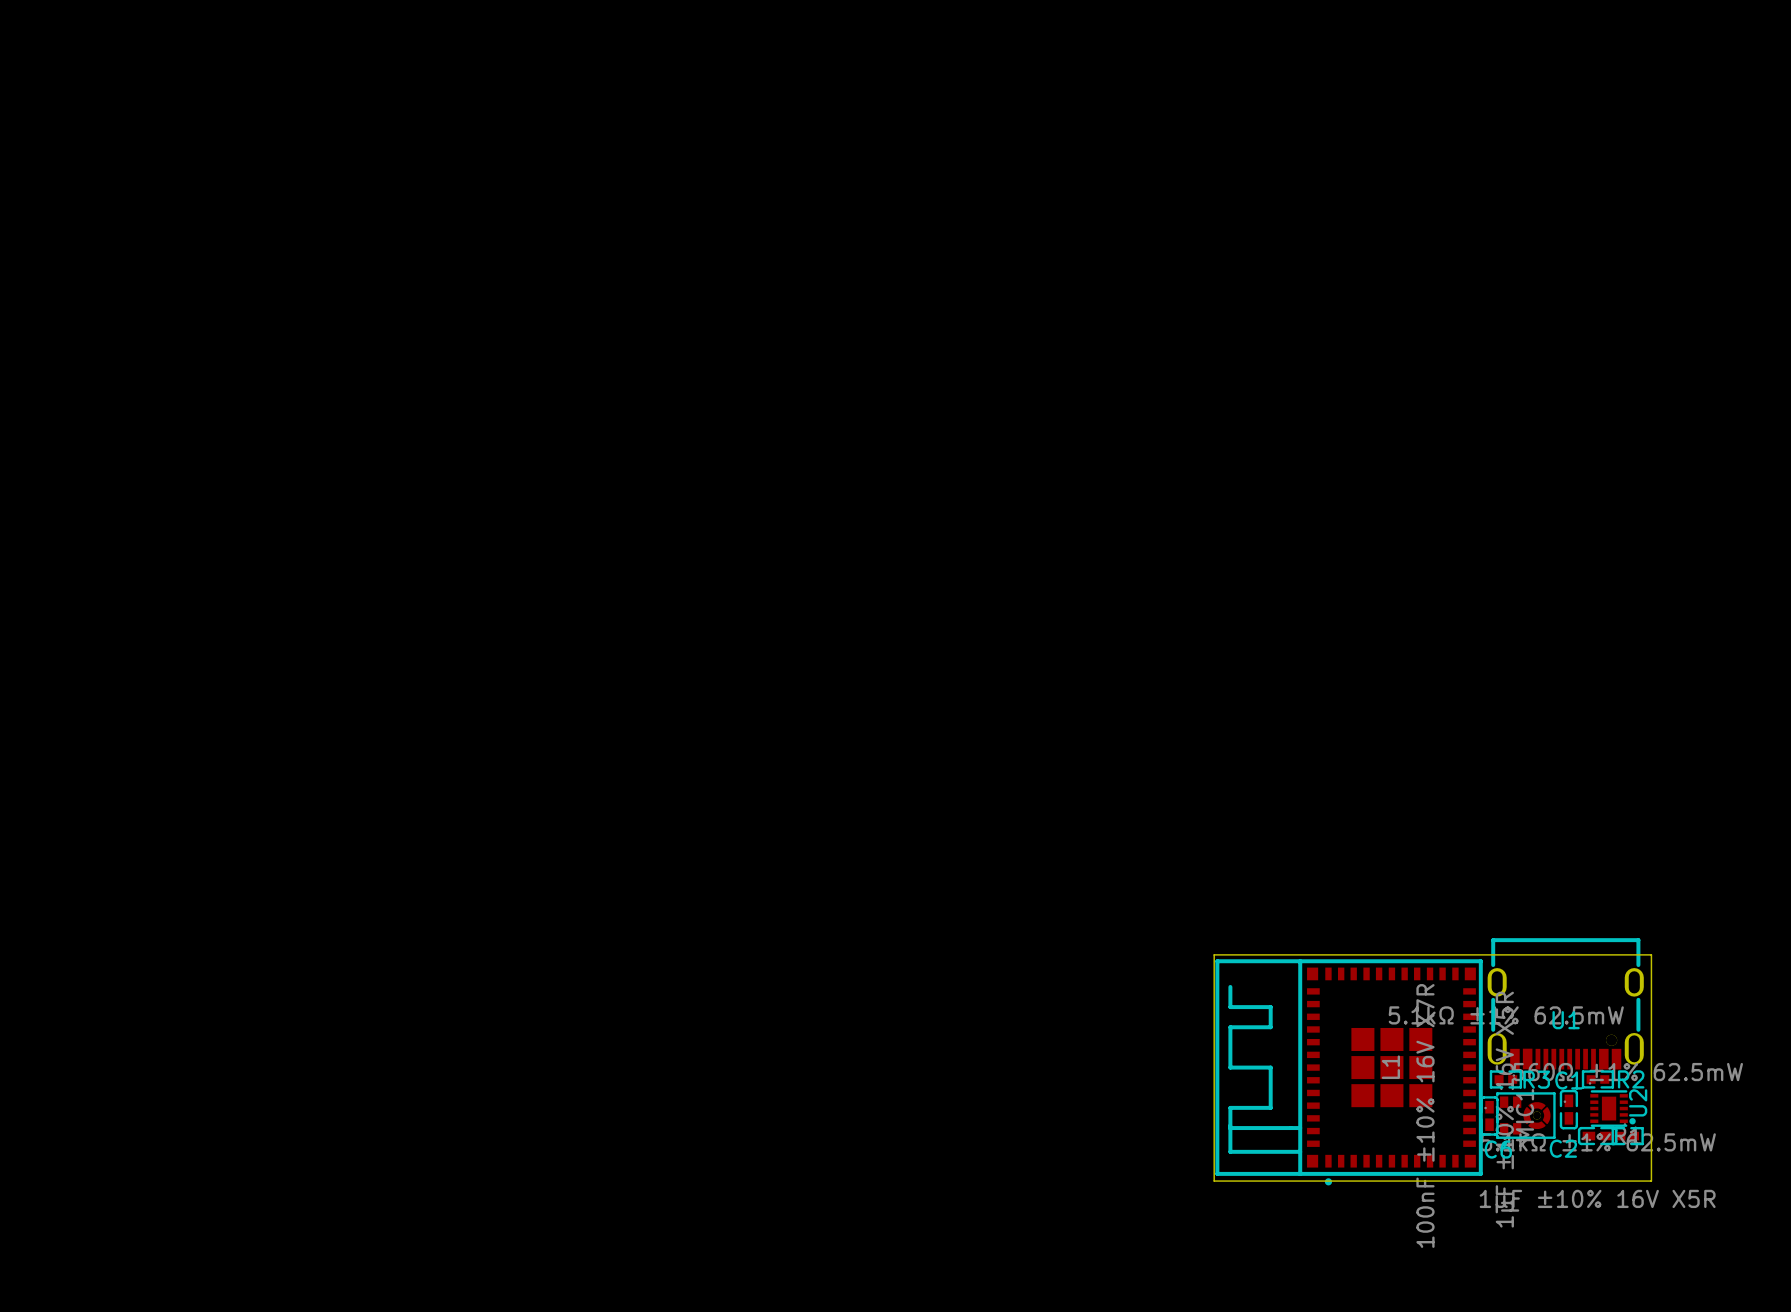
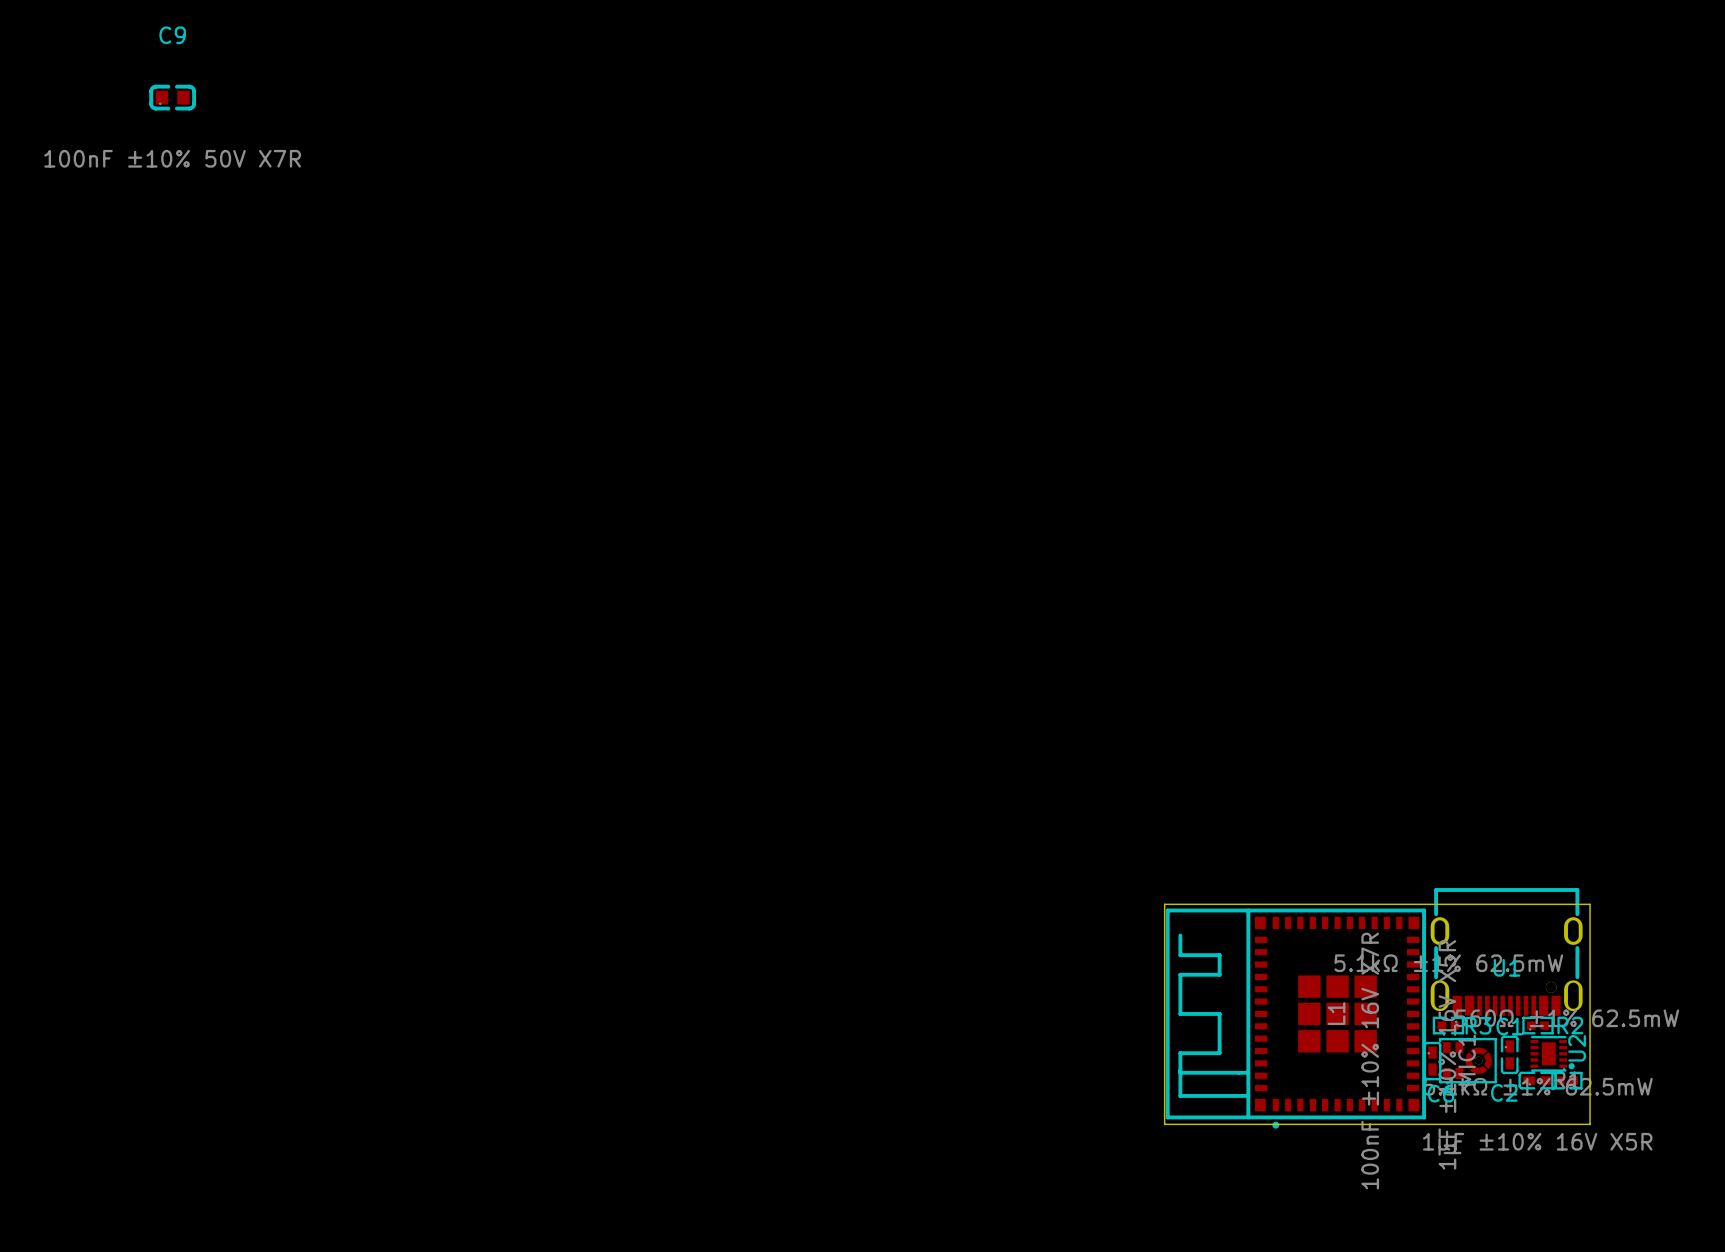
C9: none -> 100nF ±10% 50V X7R (172, 97)

